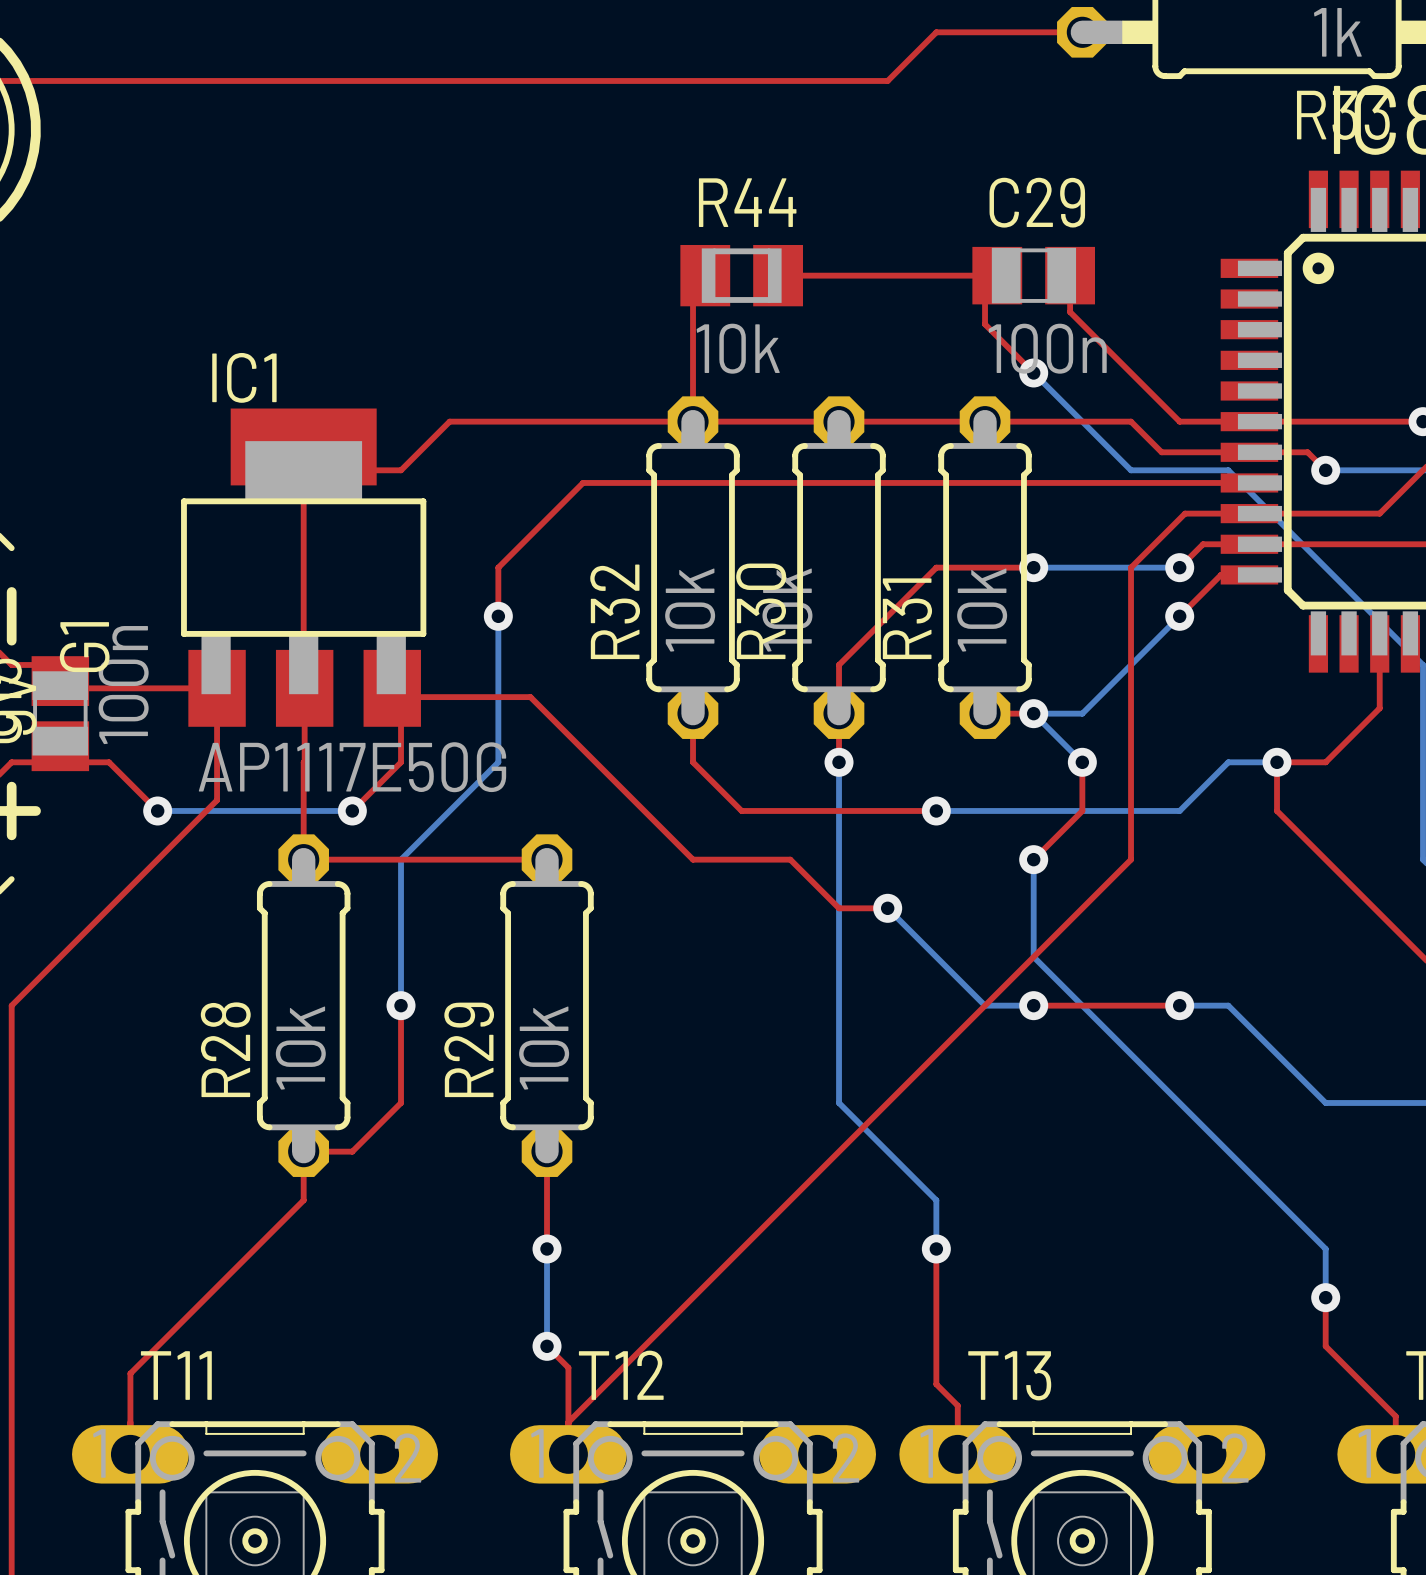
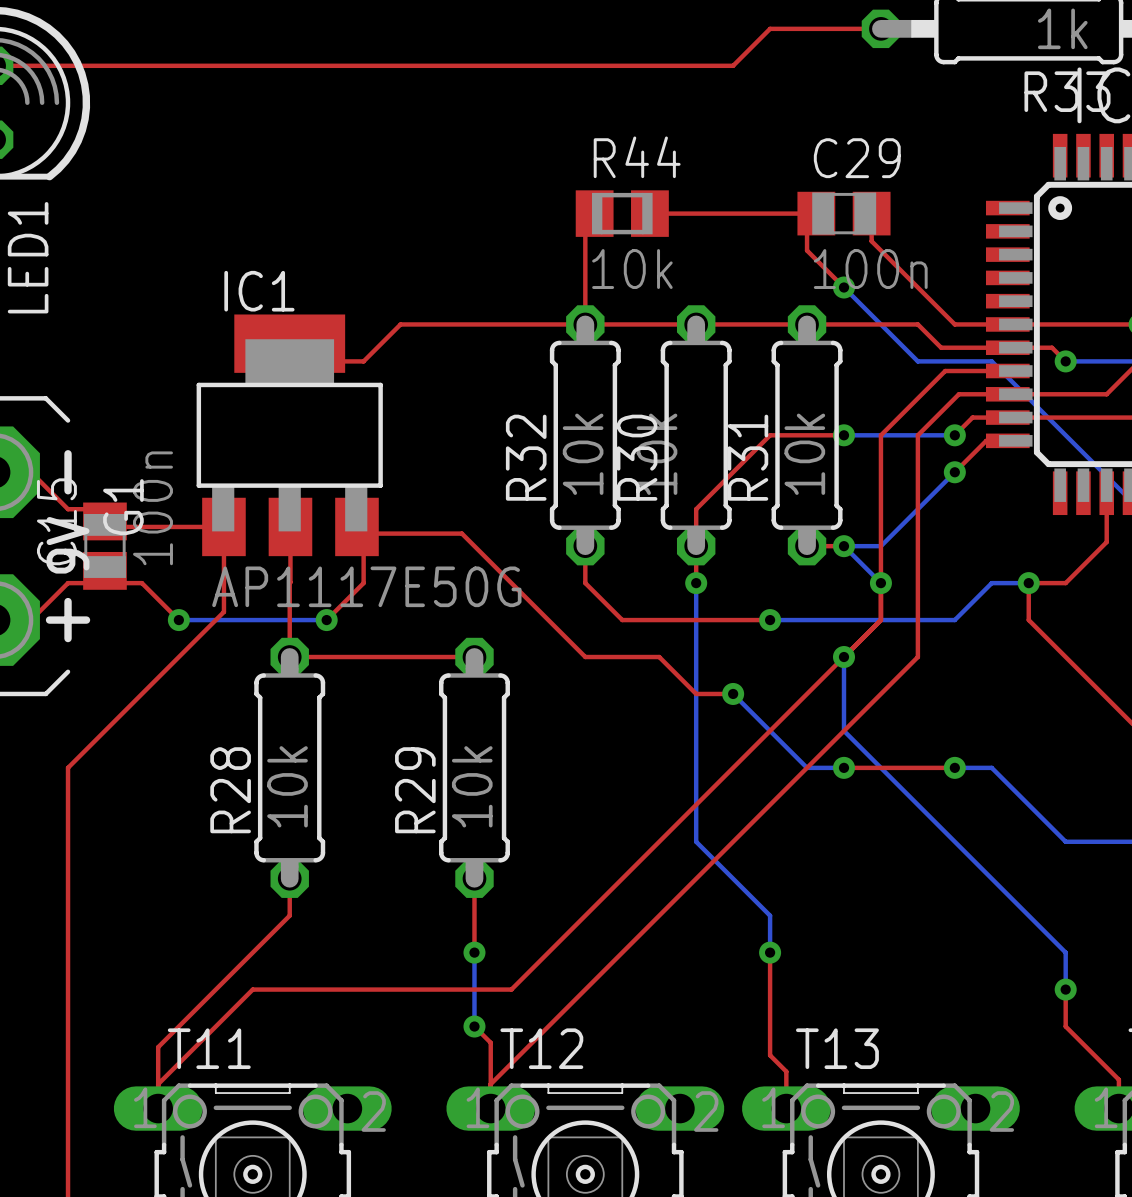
top track: (303, 470) (304, 688) -> none
top track: (1167, 482) (583, 482) (498, 567) (498, 616) -> (945, 371) (880, 435) (880, 583)
bottom track: (498, 616) (498, 762) (401, 859) (401, 1005) -> none
via: (498, 616) -> none
top track: none -> (843, 657) (511, 989) (252, 989) (158, 1084)
top track: (401, 1005) (401, 1102) (352, 1151) (303, 1151) -> none
via: (401, 1005) -> none

